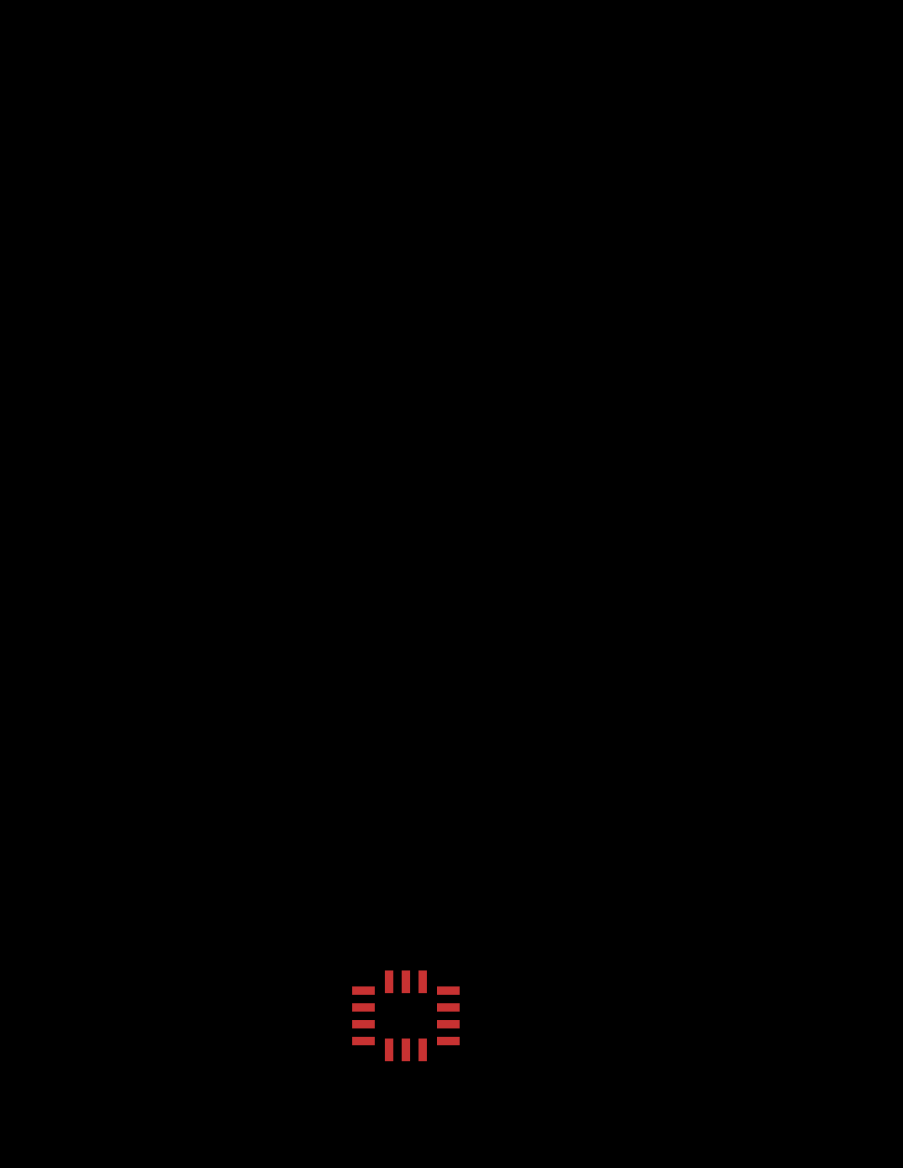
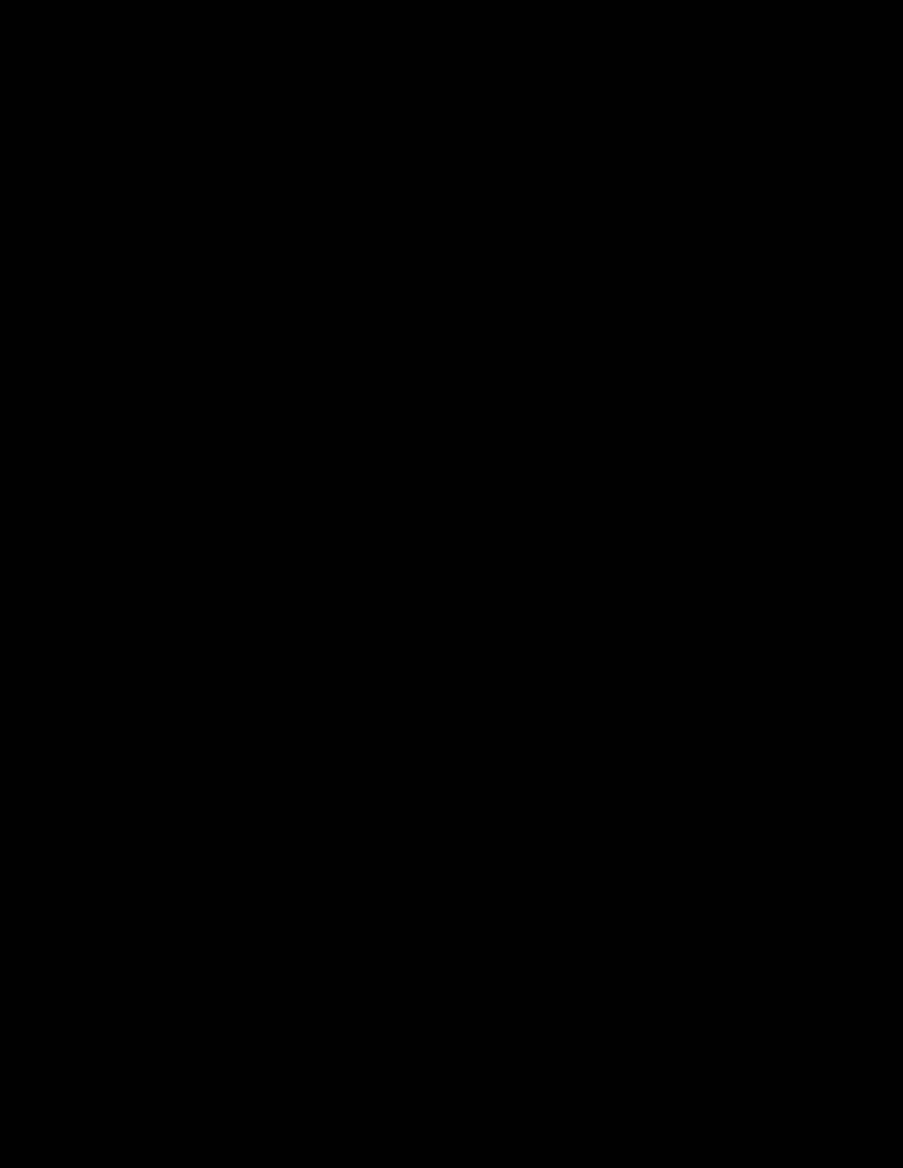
part: (405, 1015) -> none

